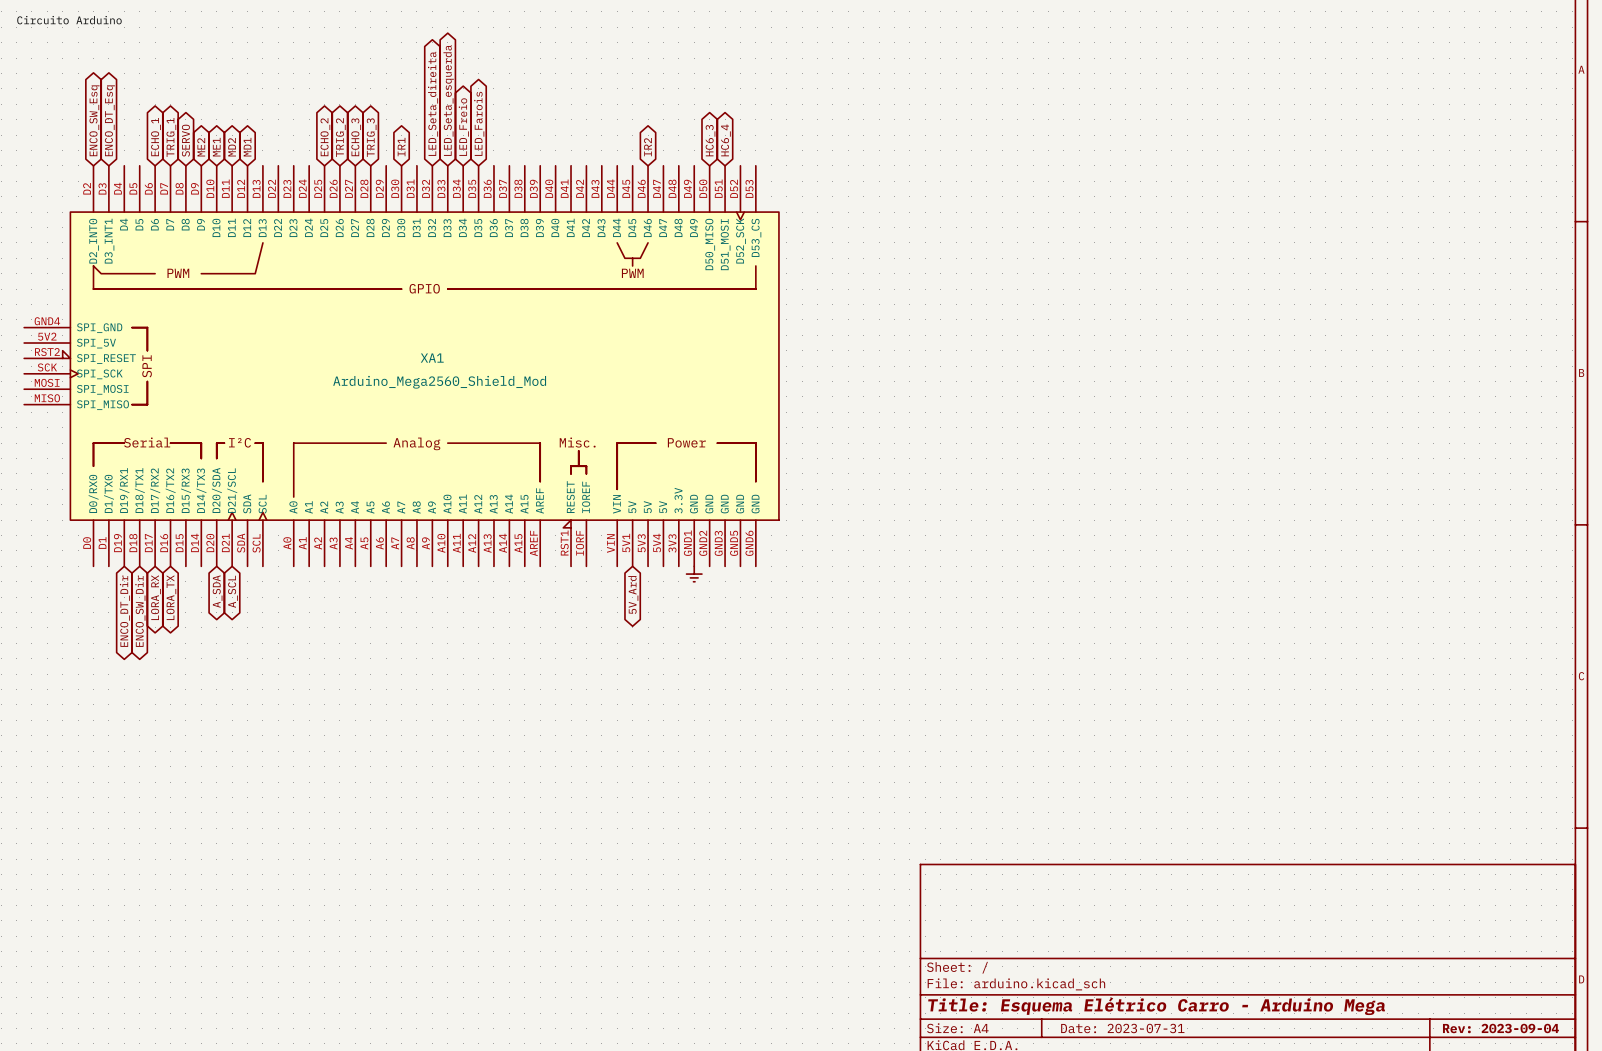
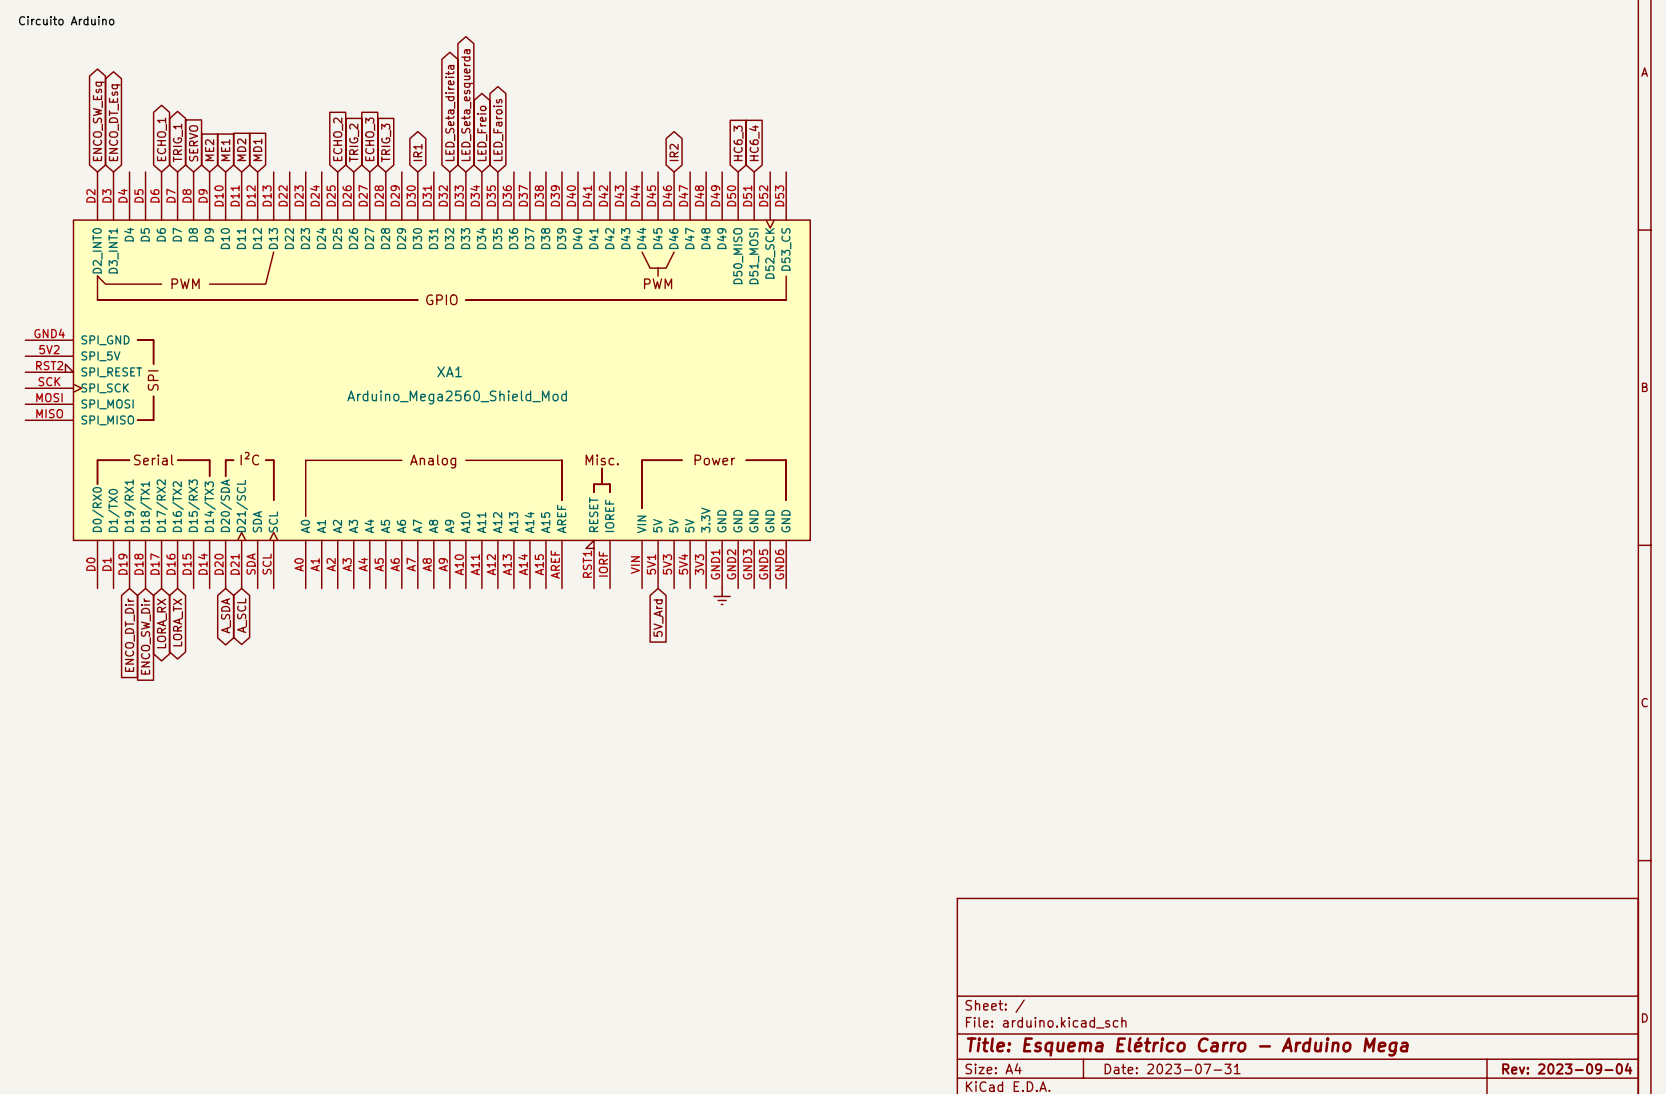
global label shape: bidirectional (325, 137) -> input (338, 139)
global label shape: bidirectional (340, 137) -> input (354, 142)
global label shape: bidirectional (356, 137) -> input (370, 139)
global label shape: bidirectional (371, 137) -> input (386, 142)
global label shape: bidirectional (185, 140) -> input (193, 143)
global label shape: bidirectional (710, 140) -> input (738, 143)
global label shape: bidirectional (725, 140) -> input (754, 143)
global label shape: bidirectional (201, 147) -> input (209, 150)
global label shape: bidirectional (216, 147) -> input (225, 150)
global label shape: bidirectional (232, 147) -> input (241, 149)
global label shape: bidirectional (247, 147) -> input (257, 149)
global label shape: bidirectional (633, 595) -> input (658, 618)
global label shape: bidirectional (124, 611) -> input (129, 635)
global label shape: bidirectional (140, 611) -> input (145, 636)

